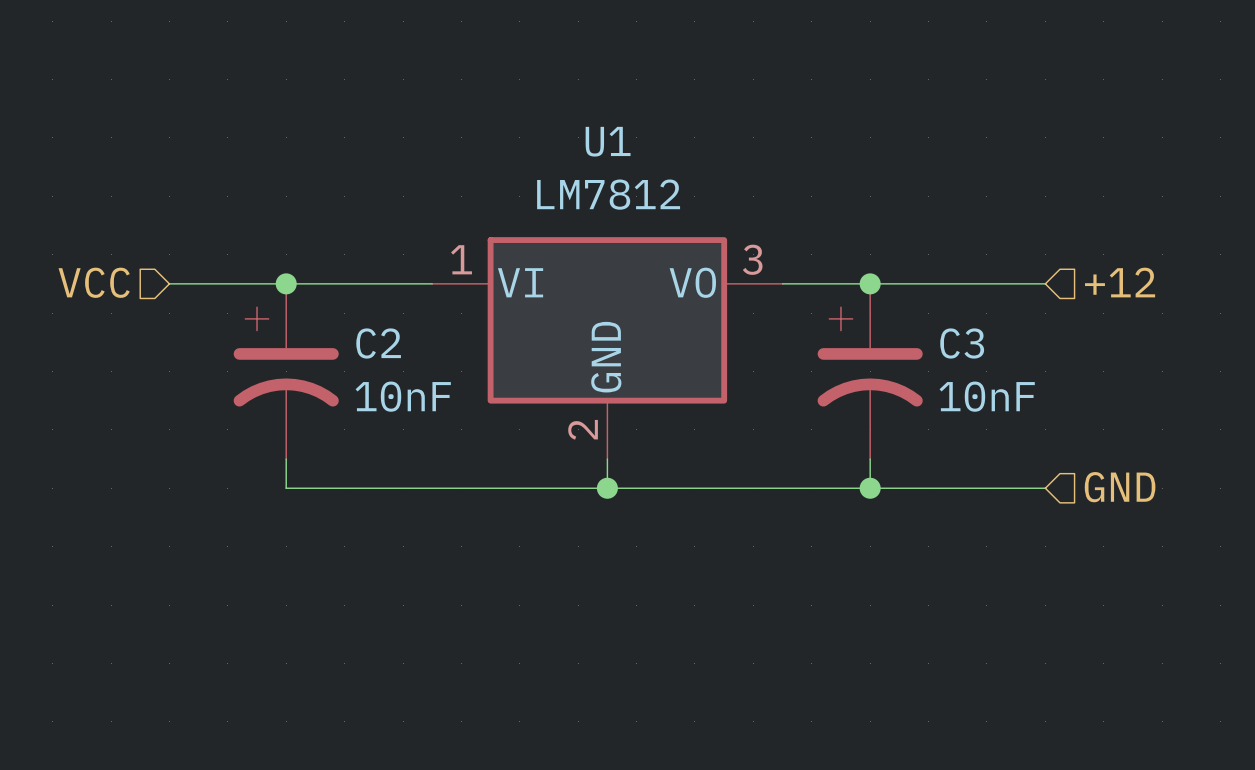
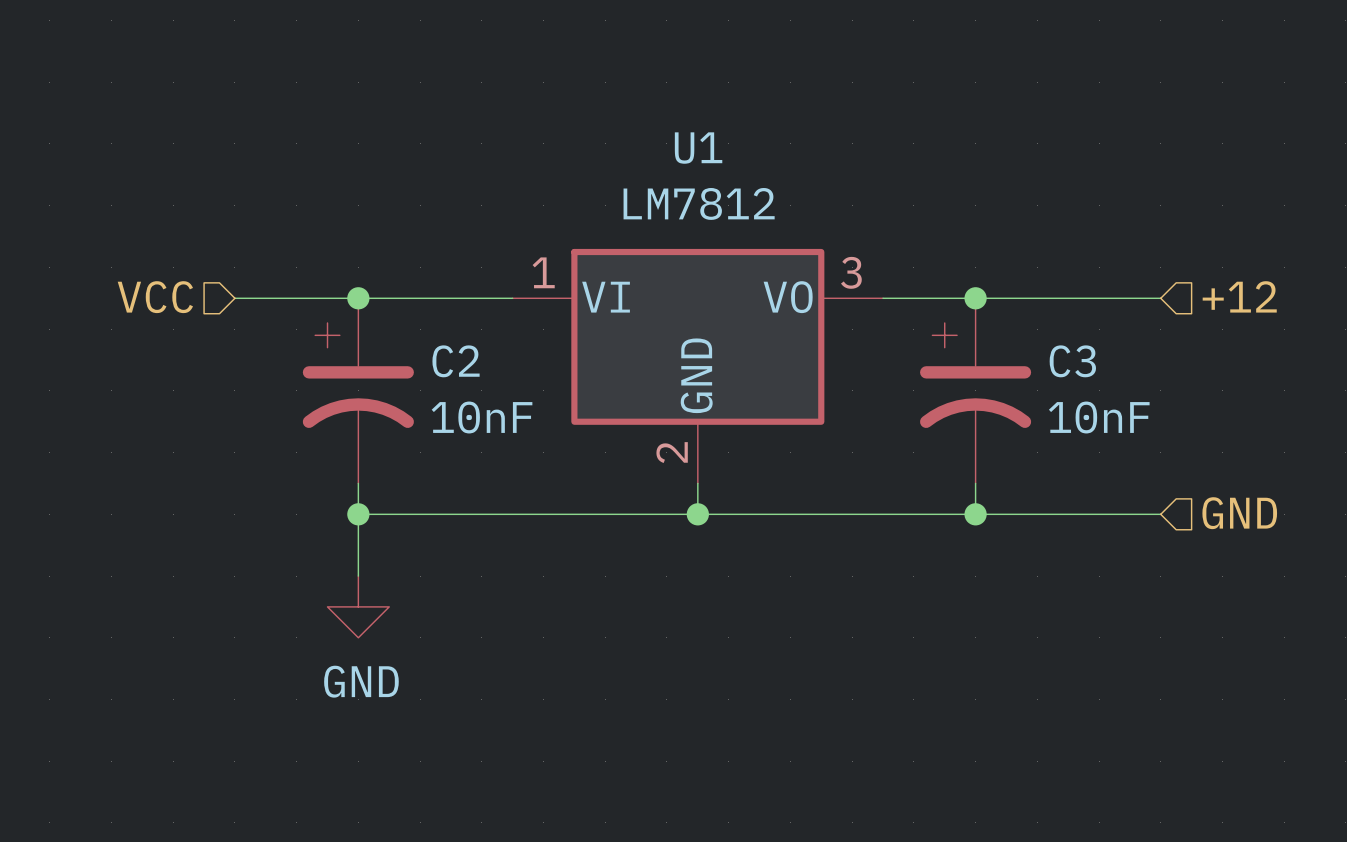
wire: none -> (358, 514) (358, 576)
junction: none -> (358, 514)
power symbol: none -> GND (358, 606)

